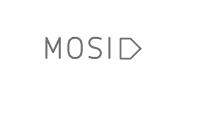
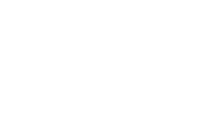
hierarchical label: MOSI (77, 47) -> none

